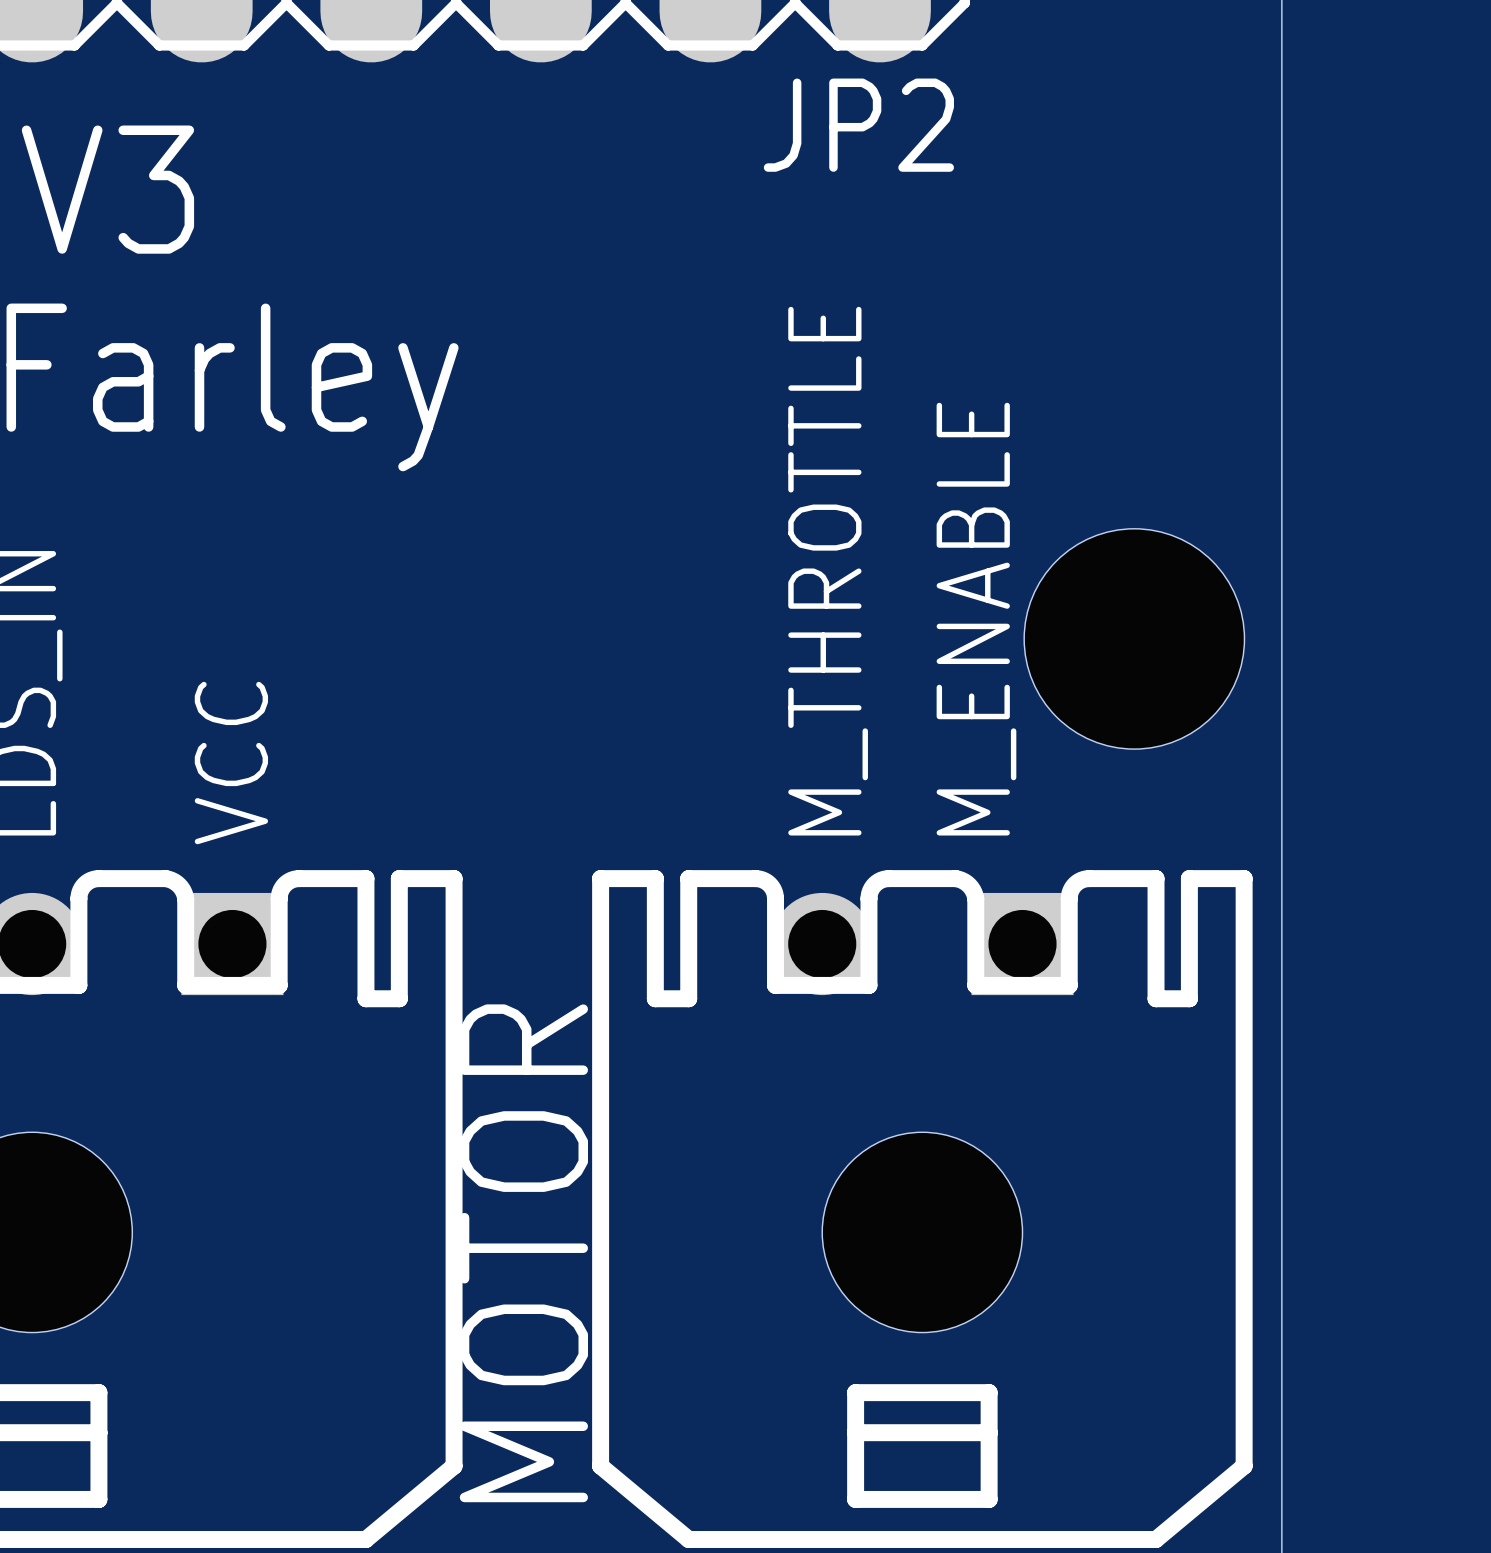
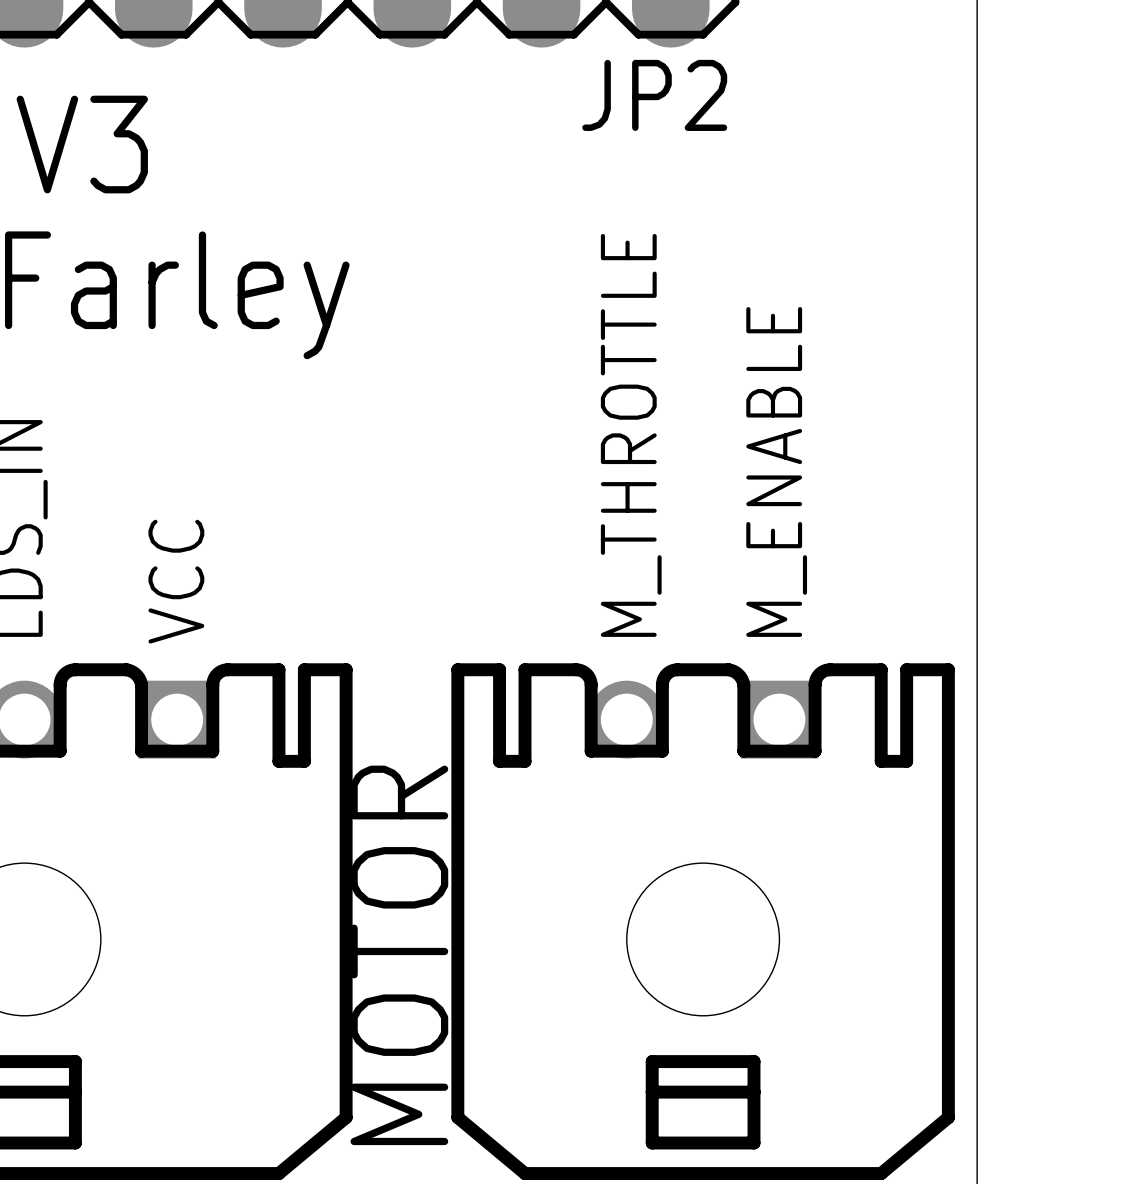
text position: M_ENABLE (976, 619) -> M_ENABLE (776, 471)
hole: (1134, 638) -> none

